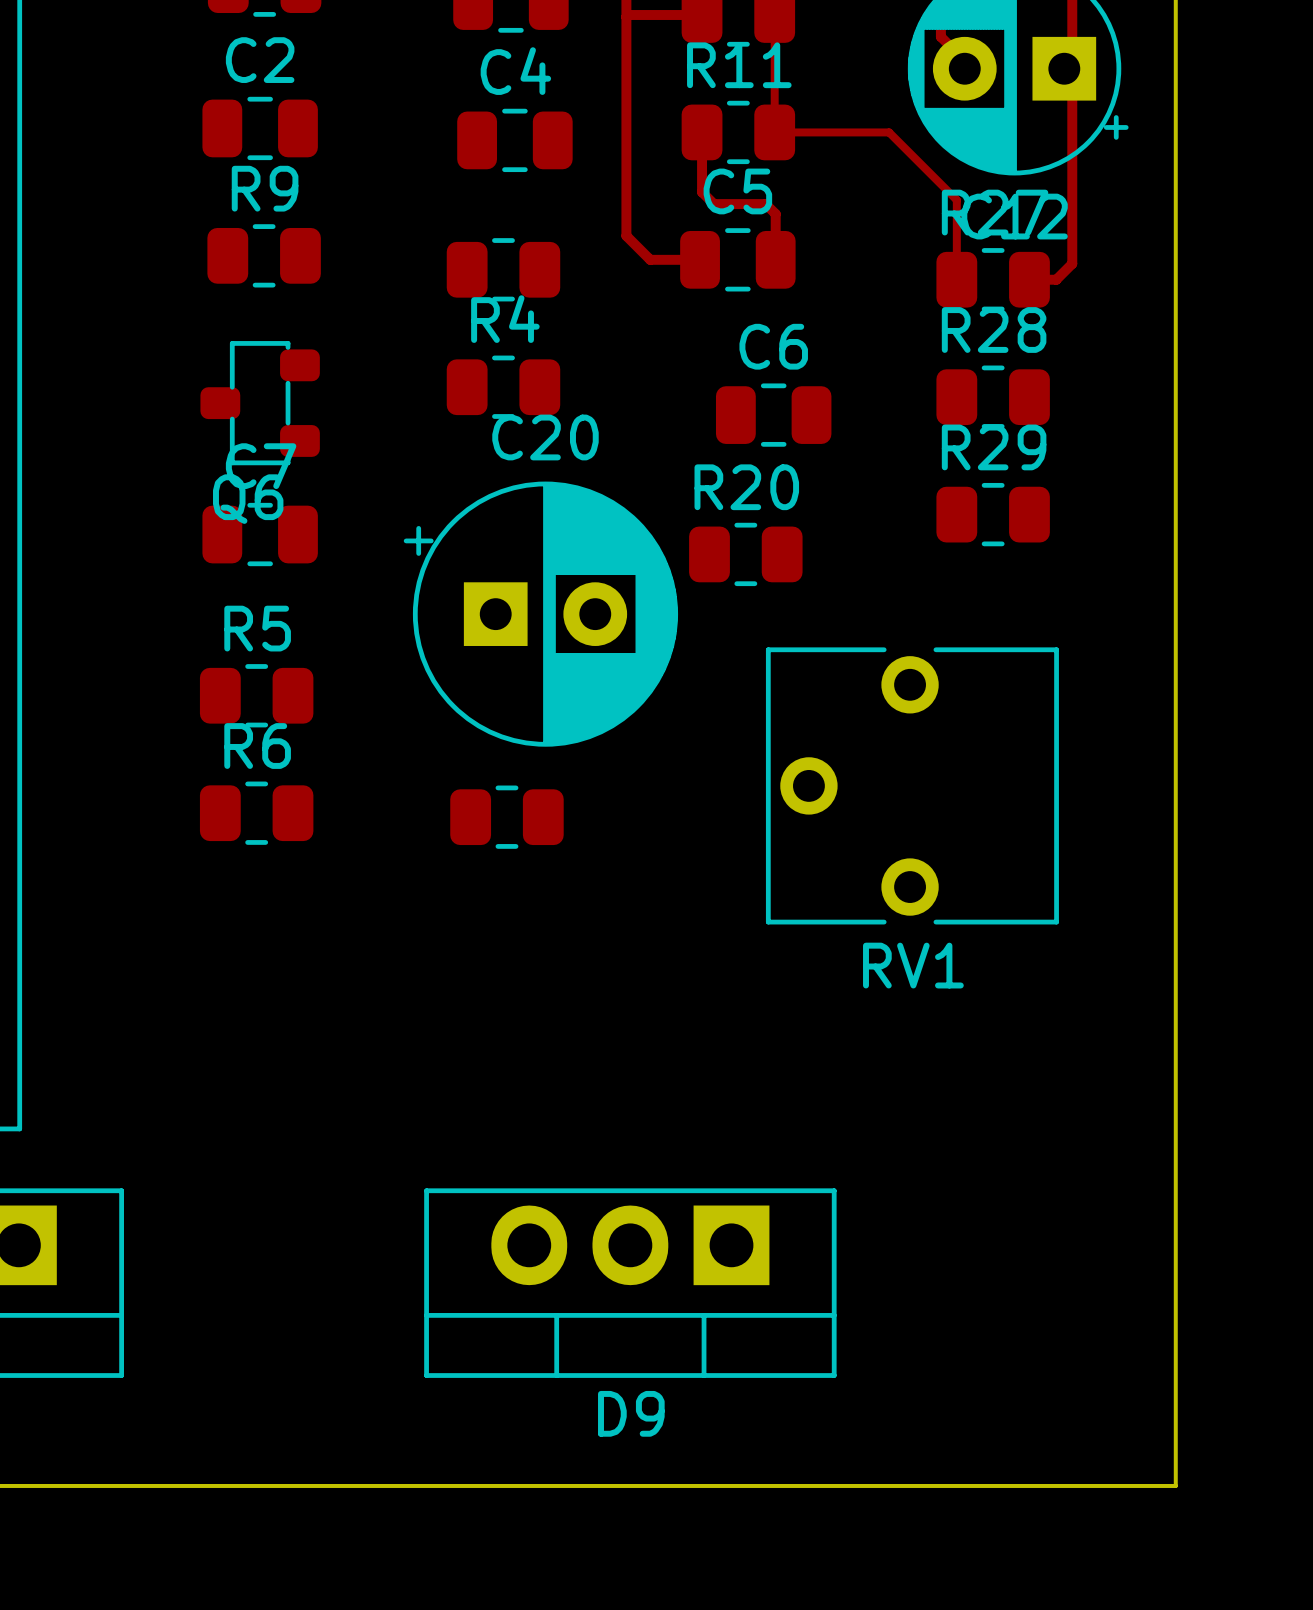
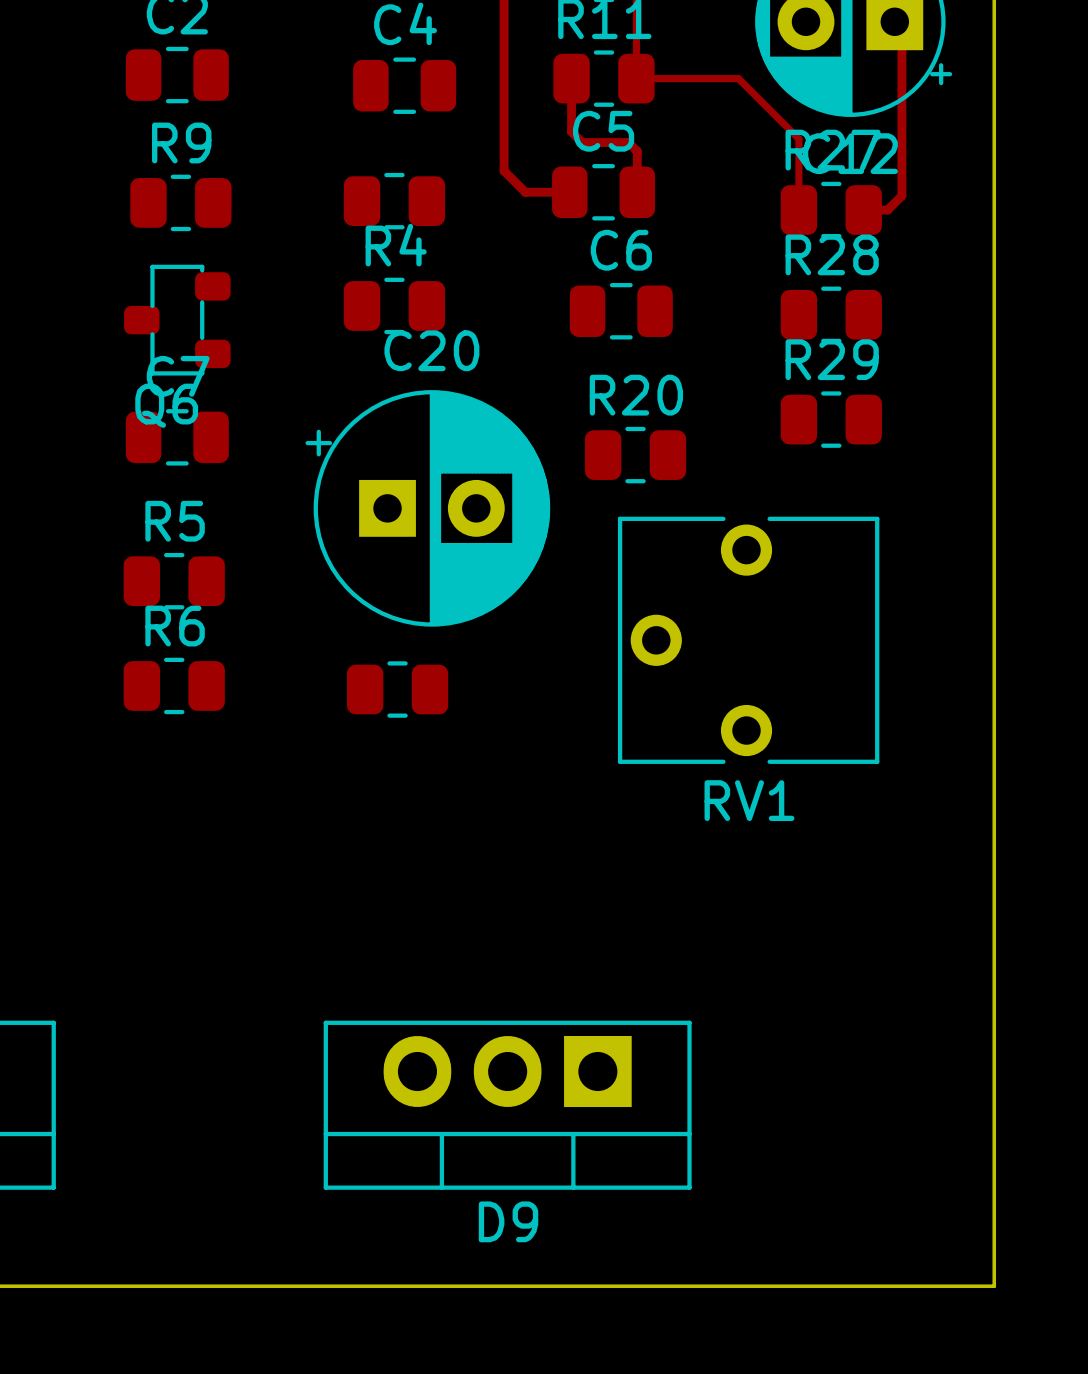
R9 position: (264, 255) -> (180, 202)
C6 position: (773, 415) -> (621, 311)
R20 position: (745, 554) -> (635, 455)
RV1 position: (912, 785) -> (748, 640)

